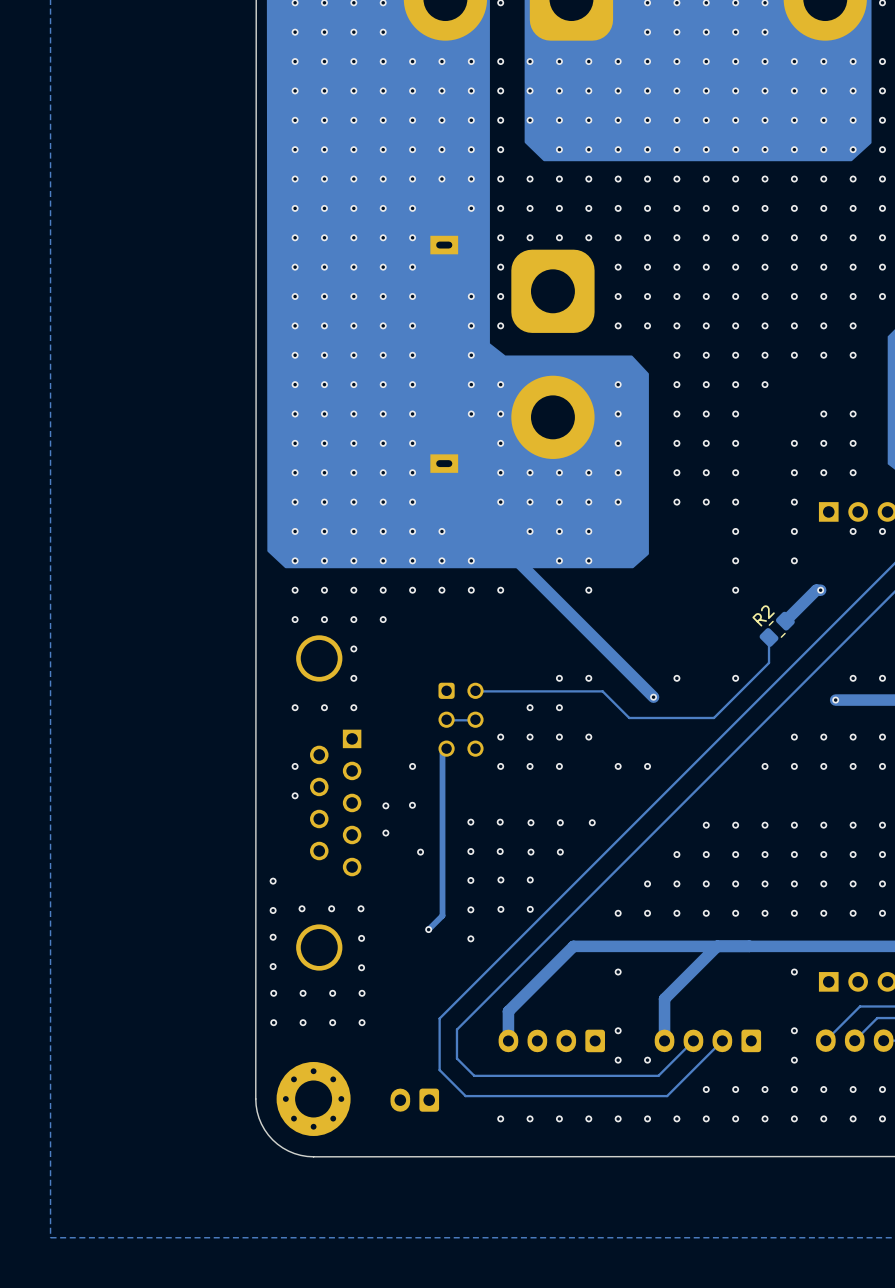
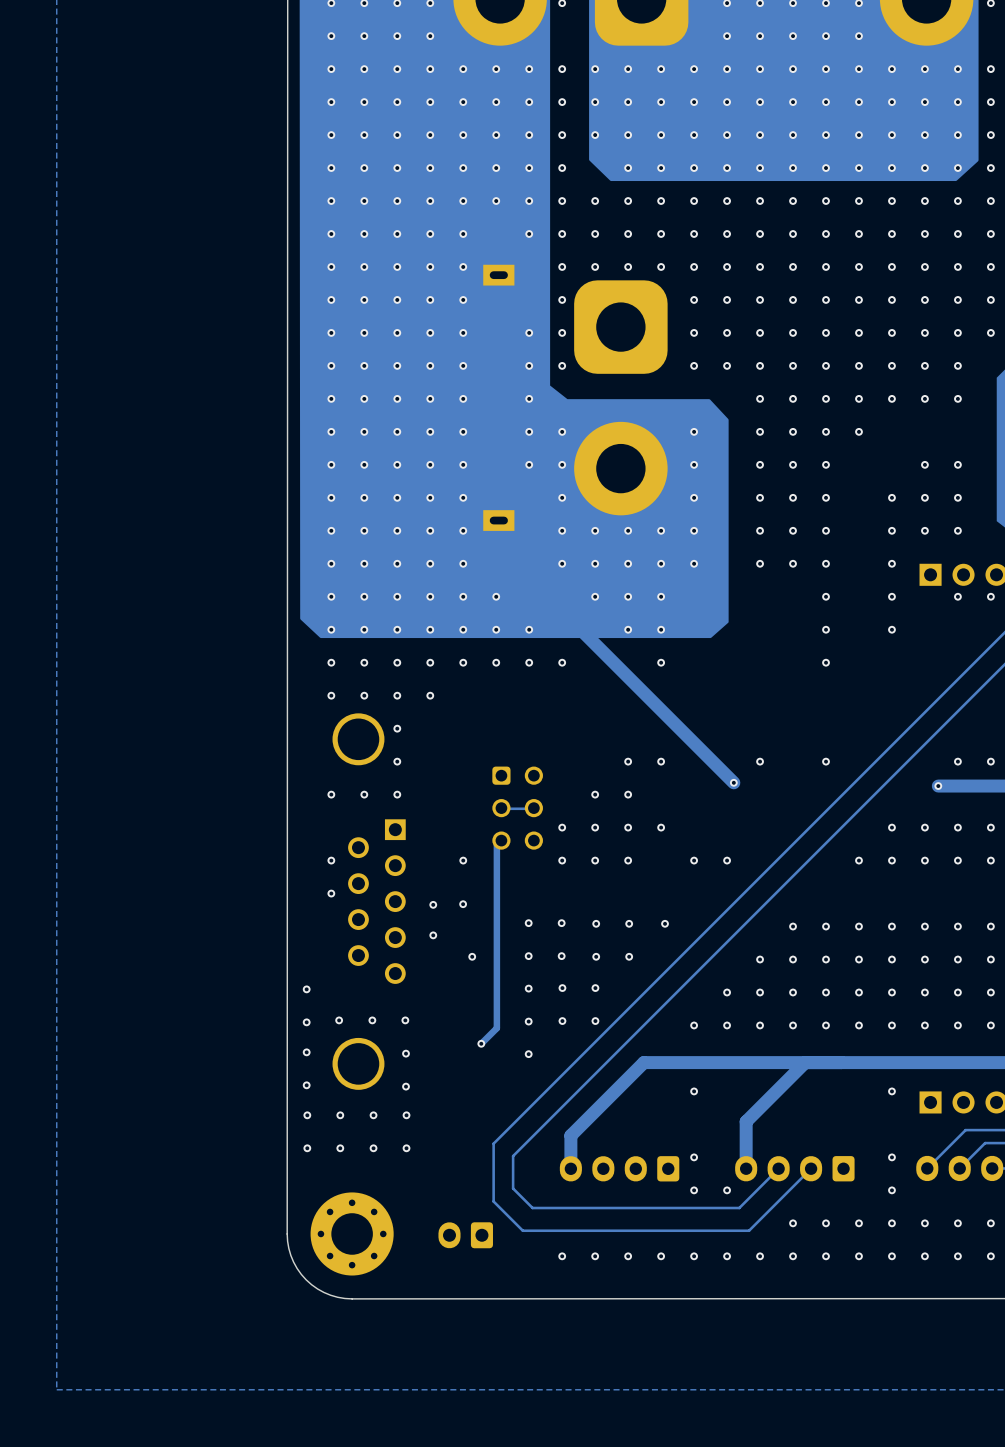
track: (820, 590) (816, 590) (785, 621) -> none
via: (820, 590) -> none
R2: (777, 629) -> none
track: (769, 637) (769, 662) (713, 717) (629, 717) (602, 691) (480, 691) -> none

